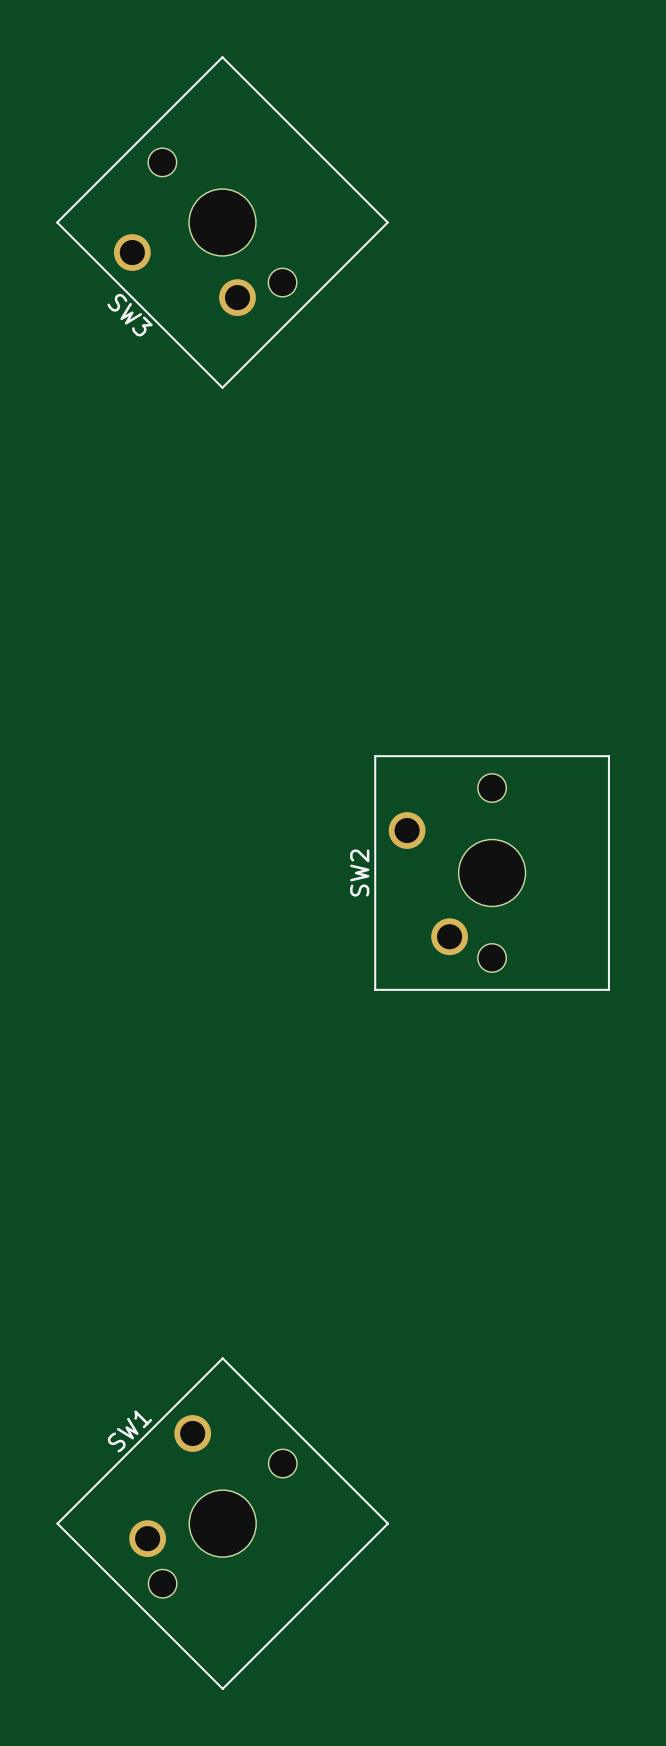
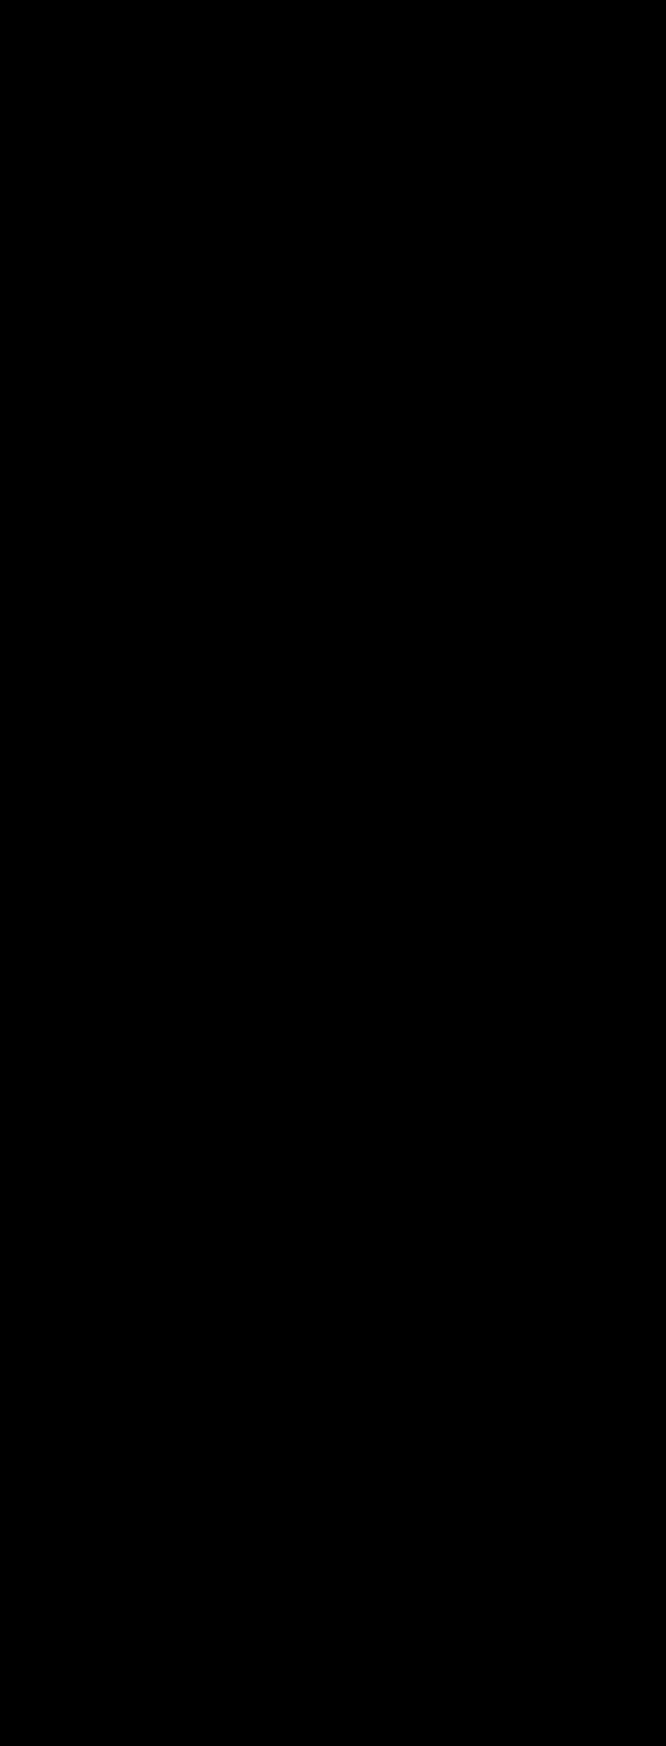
SW3: (222, 222) -> none
SW2: (492, 873) -> none
SW1: (222, 1523) -> none

